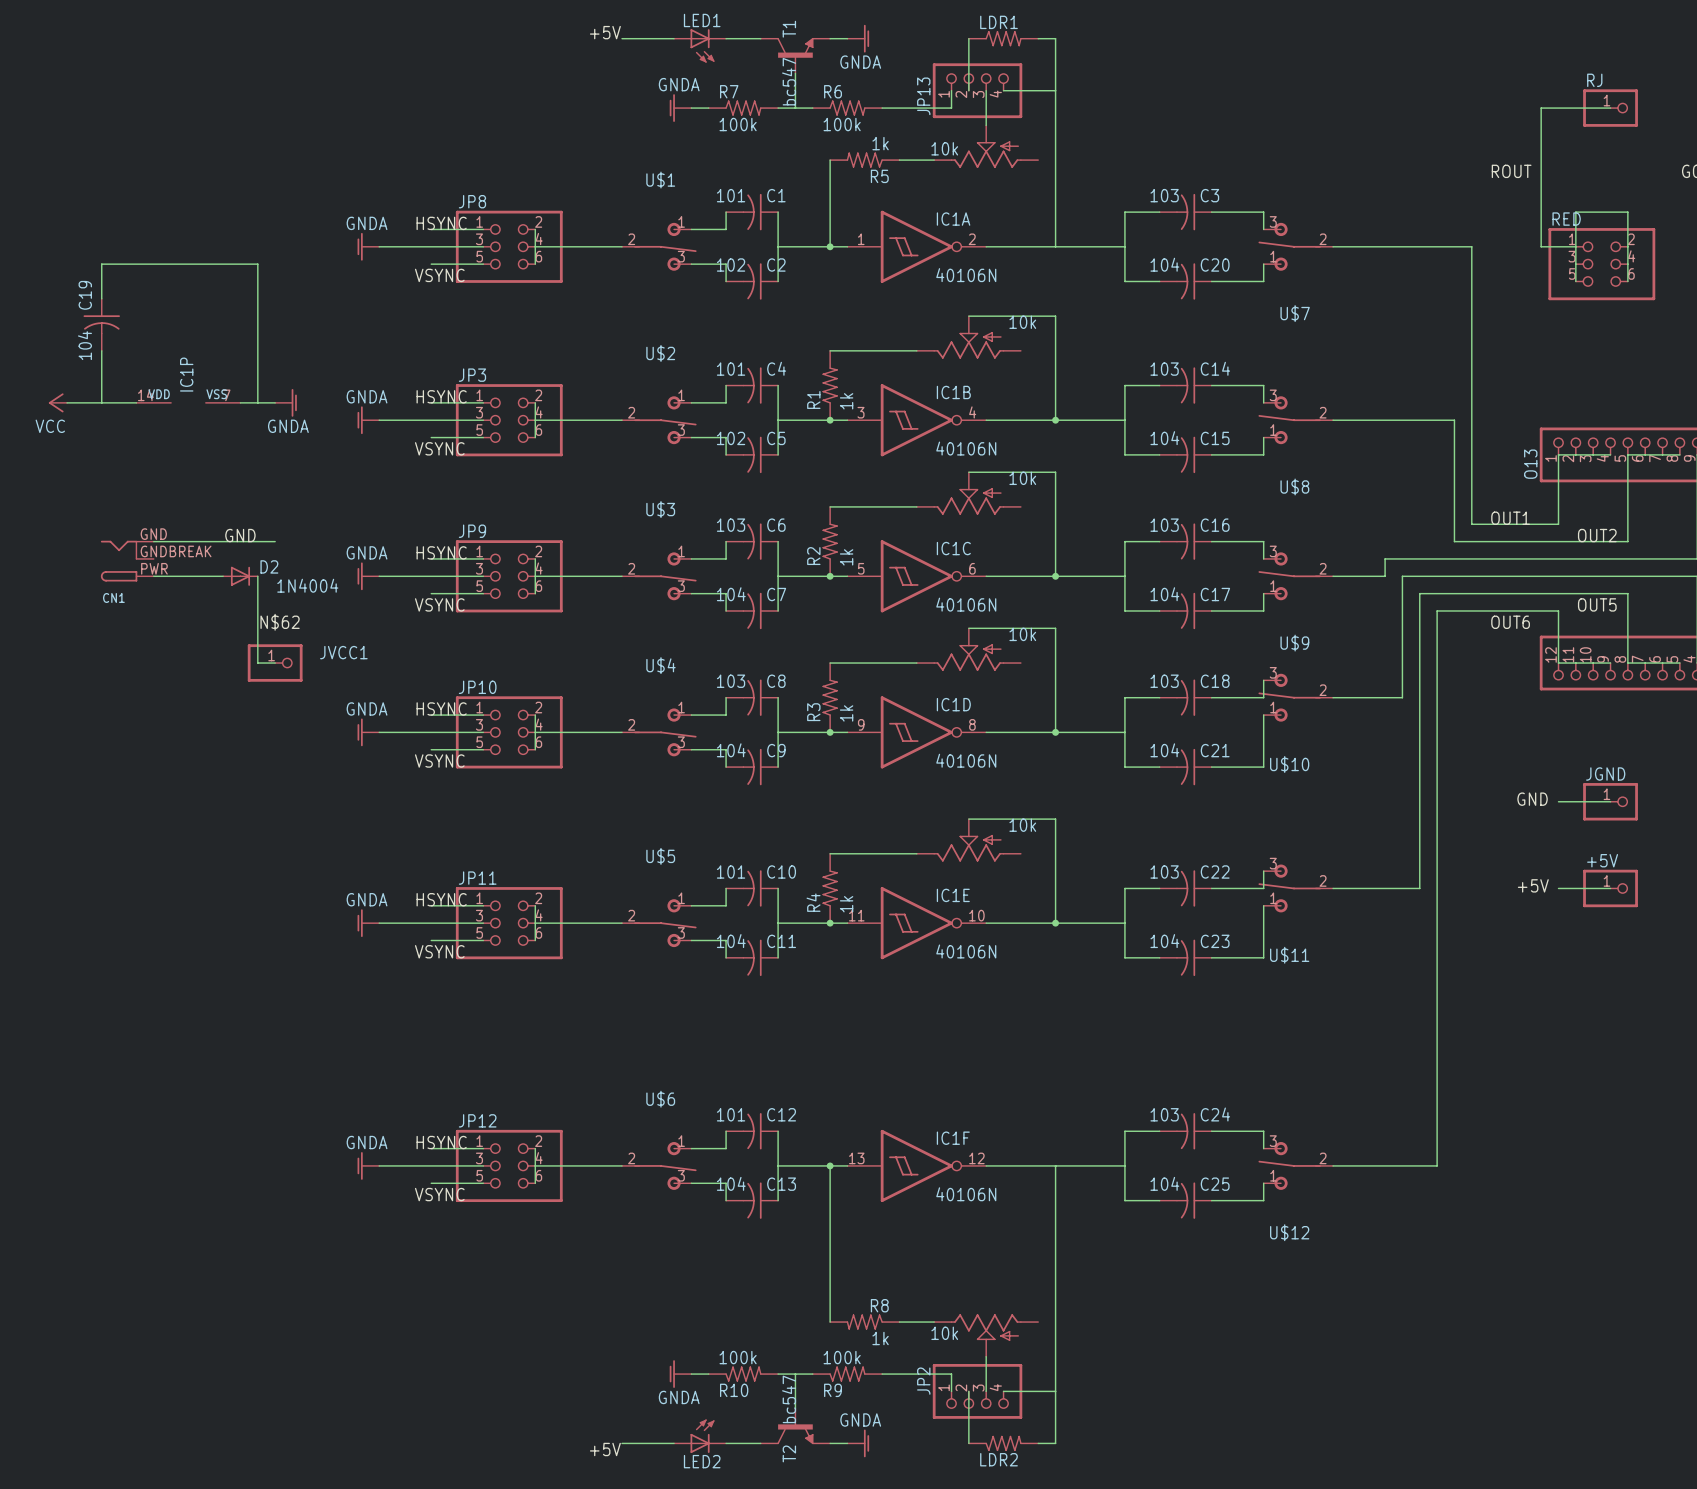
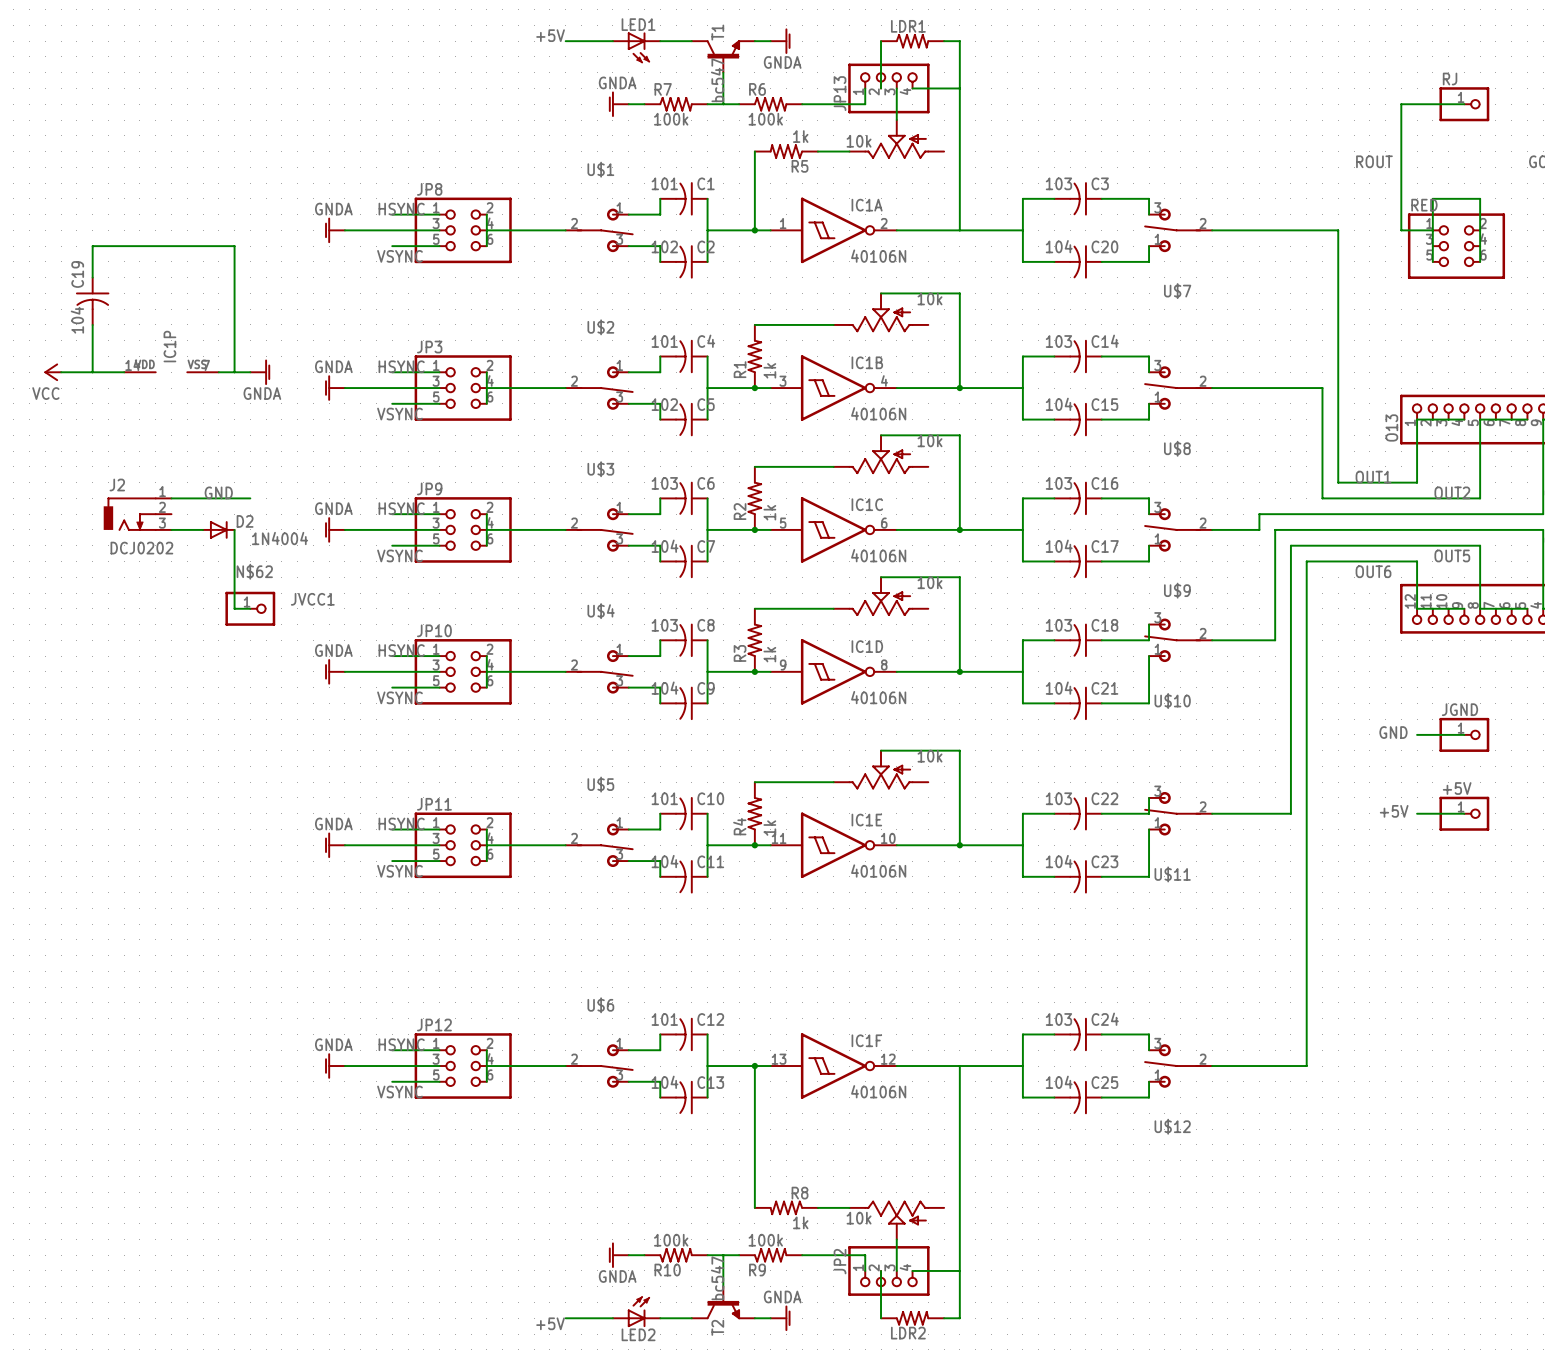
J2: none -> DCJ0202 (137, 514)
CN1: (127, 561) -> none

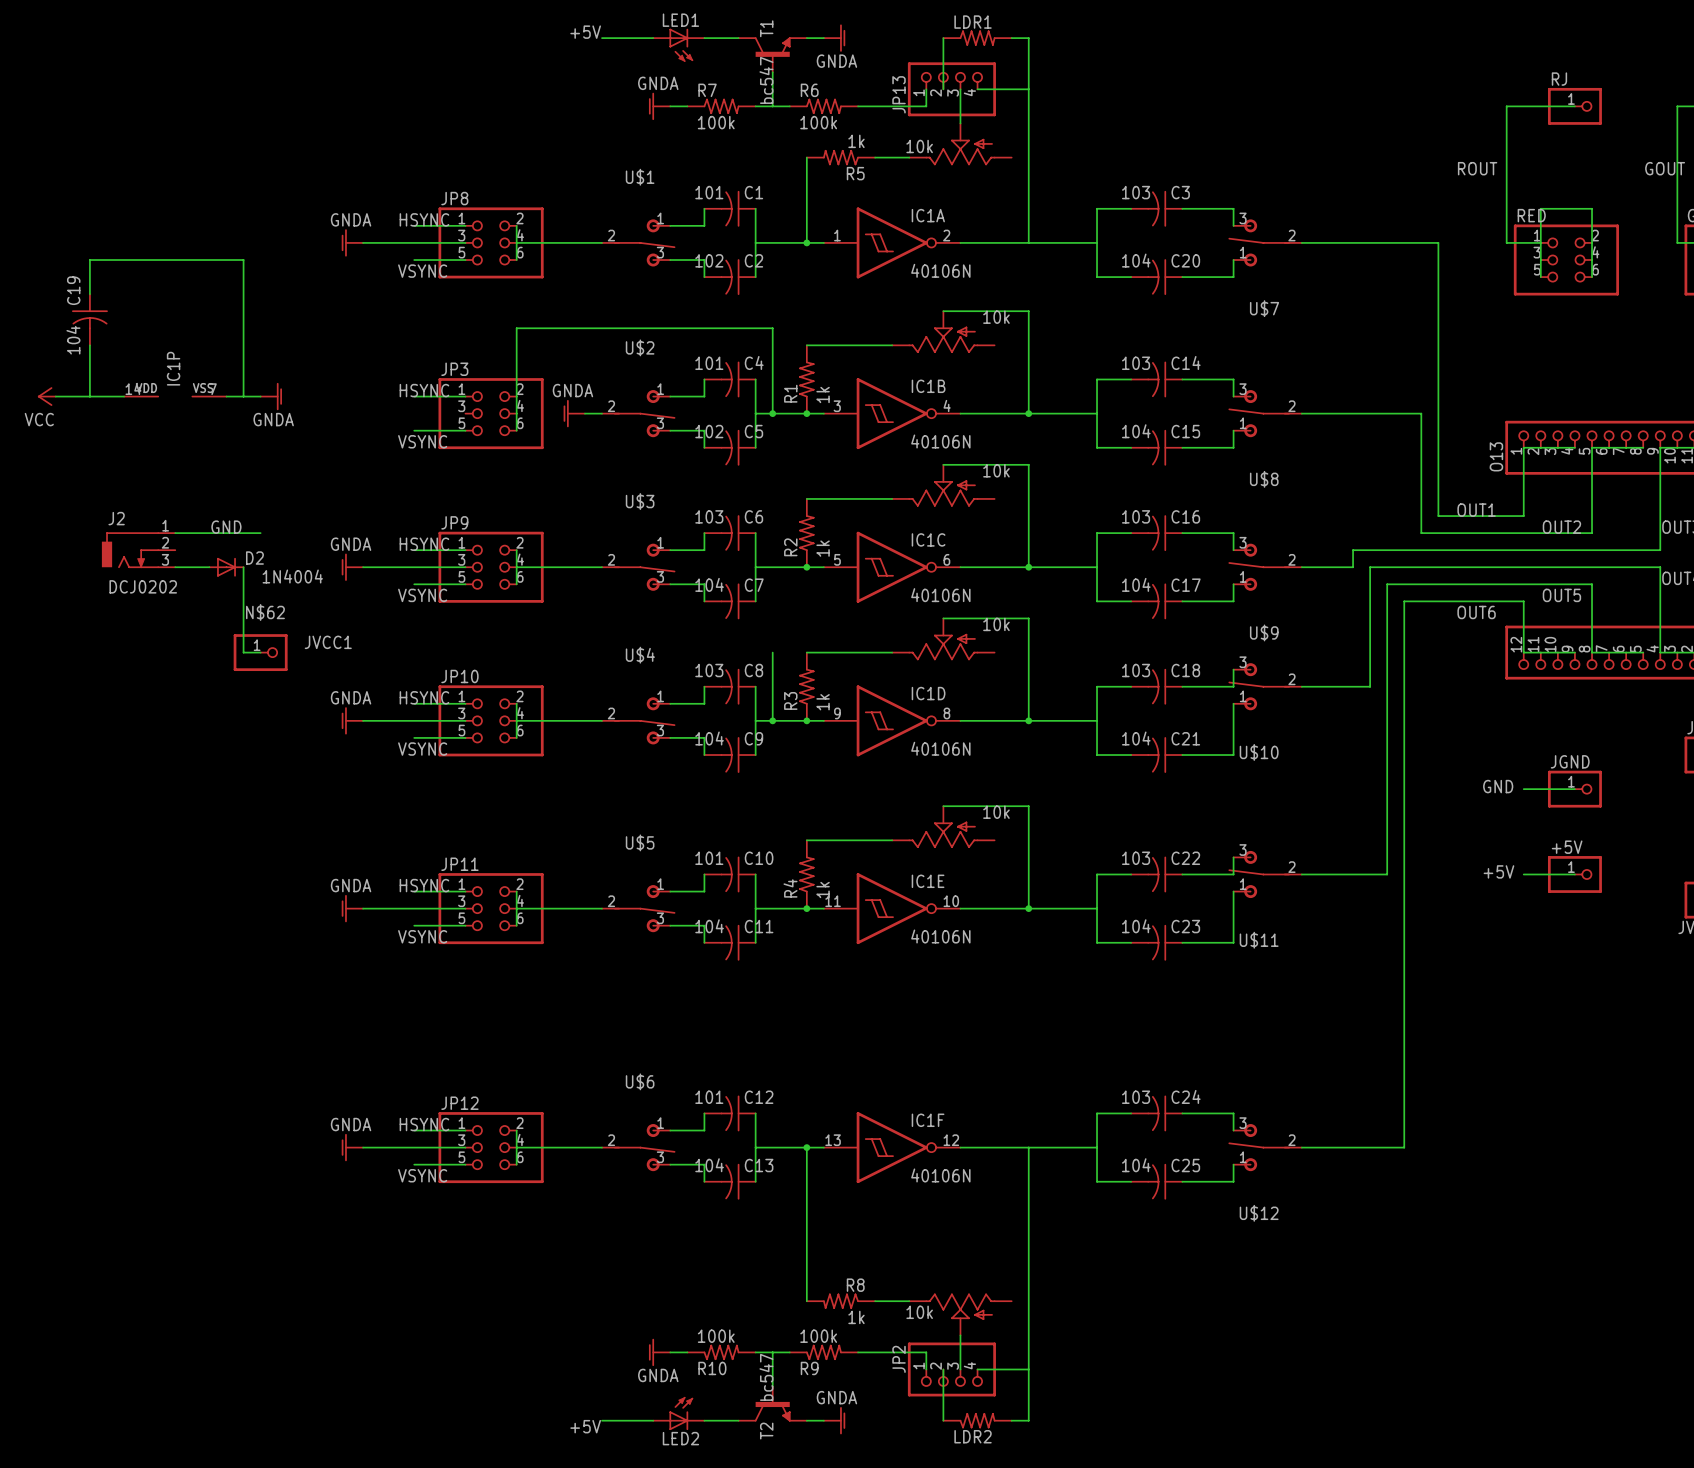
wire: none -> (516, 396) (516, 328) (772, 328) (772, 413)
power symbol: GNDA (335, 388) -> none
wire: (344, 388) (439, 388) -> none
wire: (486, 388) (549, 388) -> none
power symbol: none -> GNDA (574, 413)
junction: none -> (772, 413)
wire: none -> (772, 652) (772, 720)
junction: none -> (772, 720)

